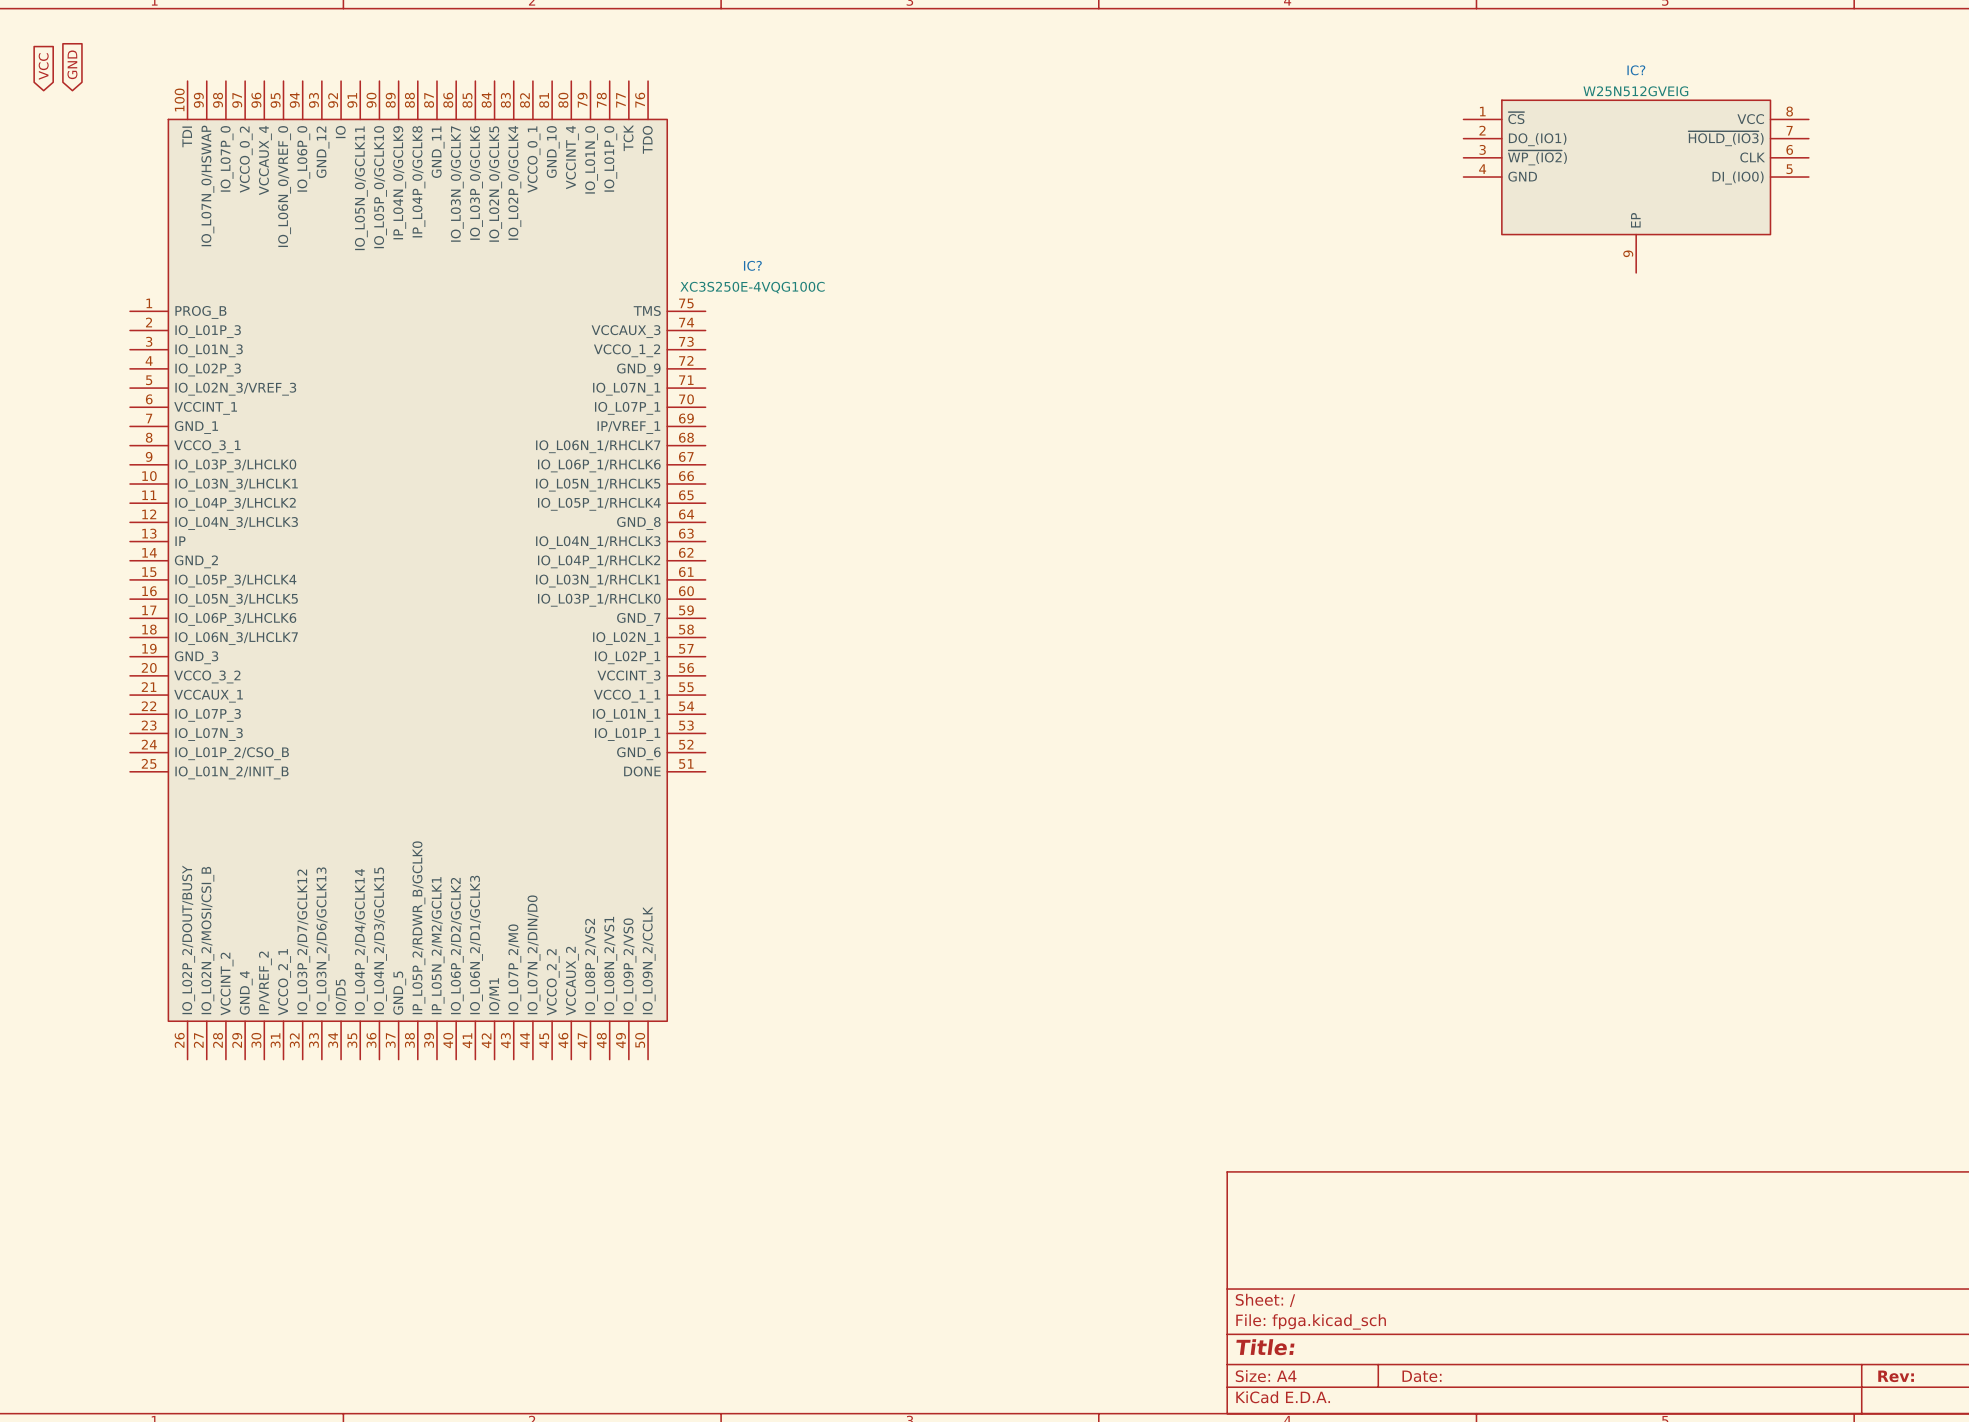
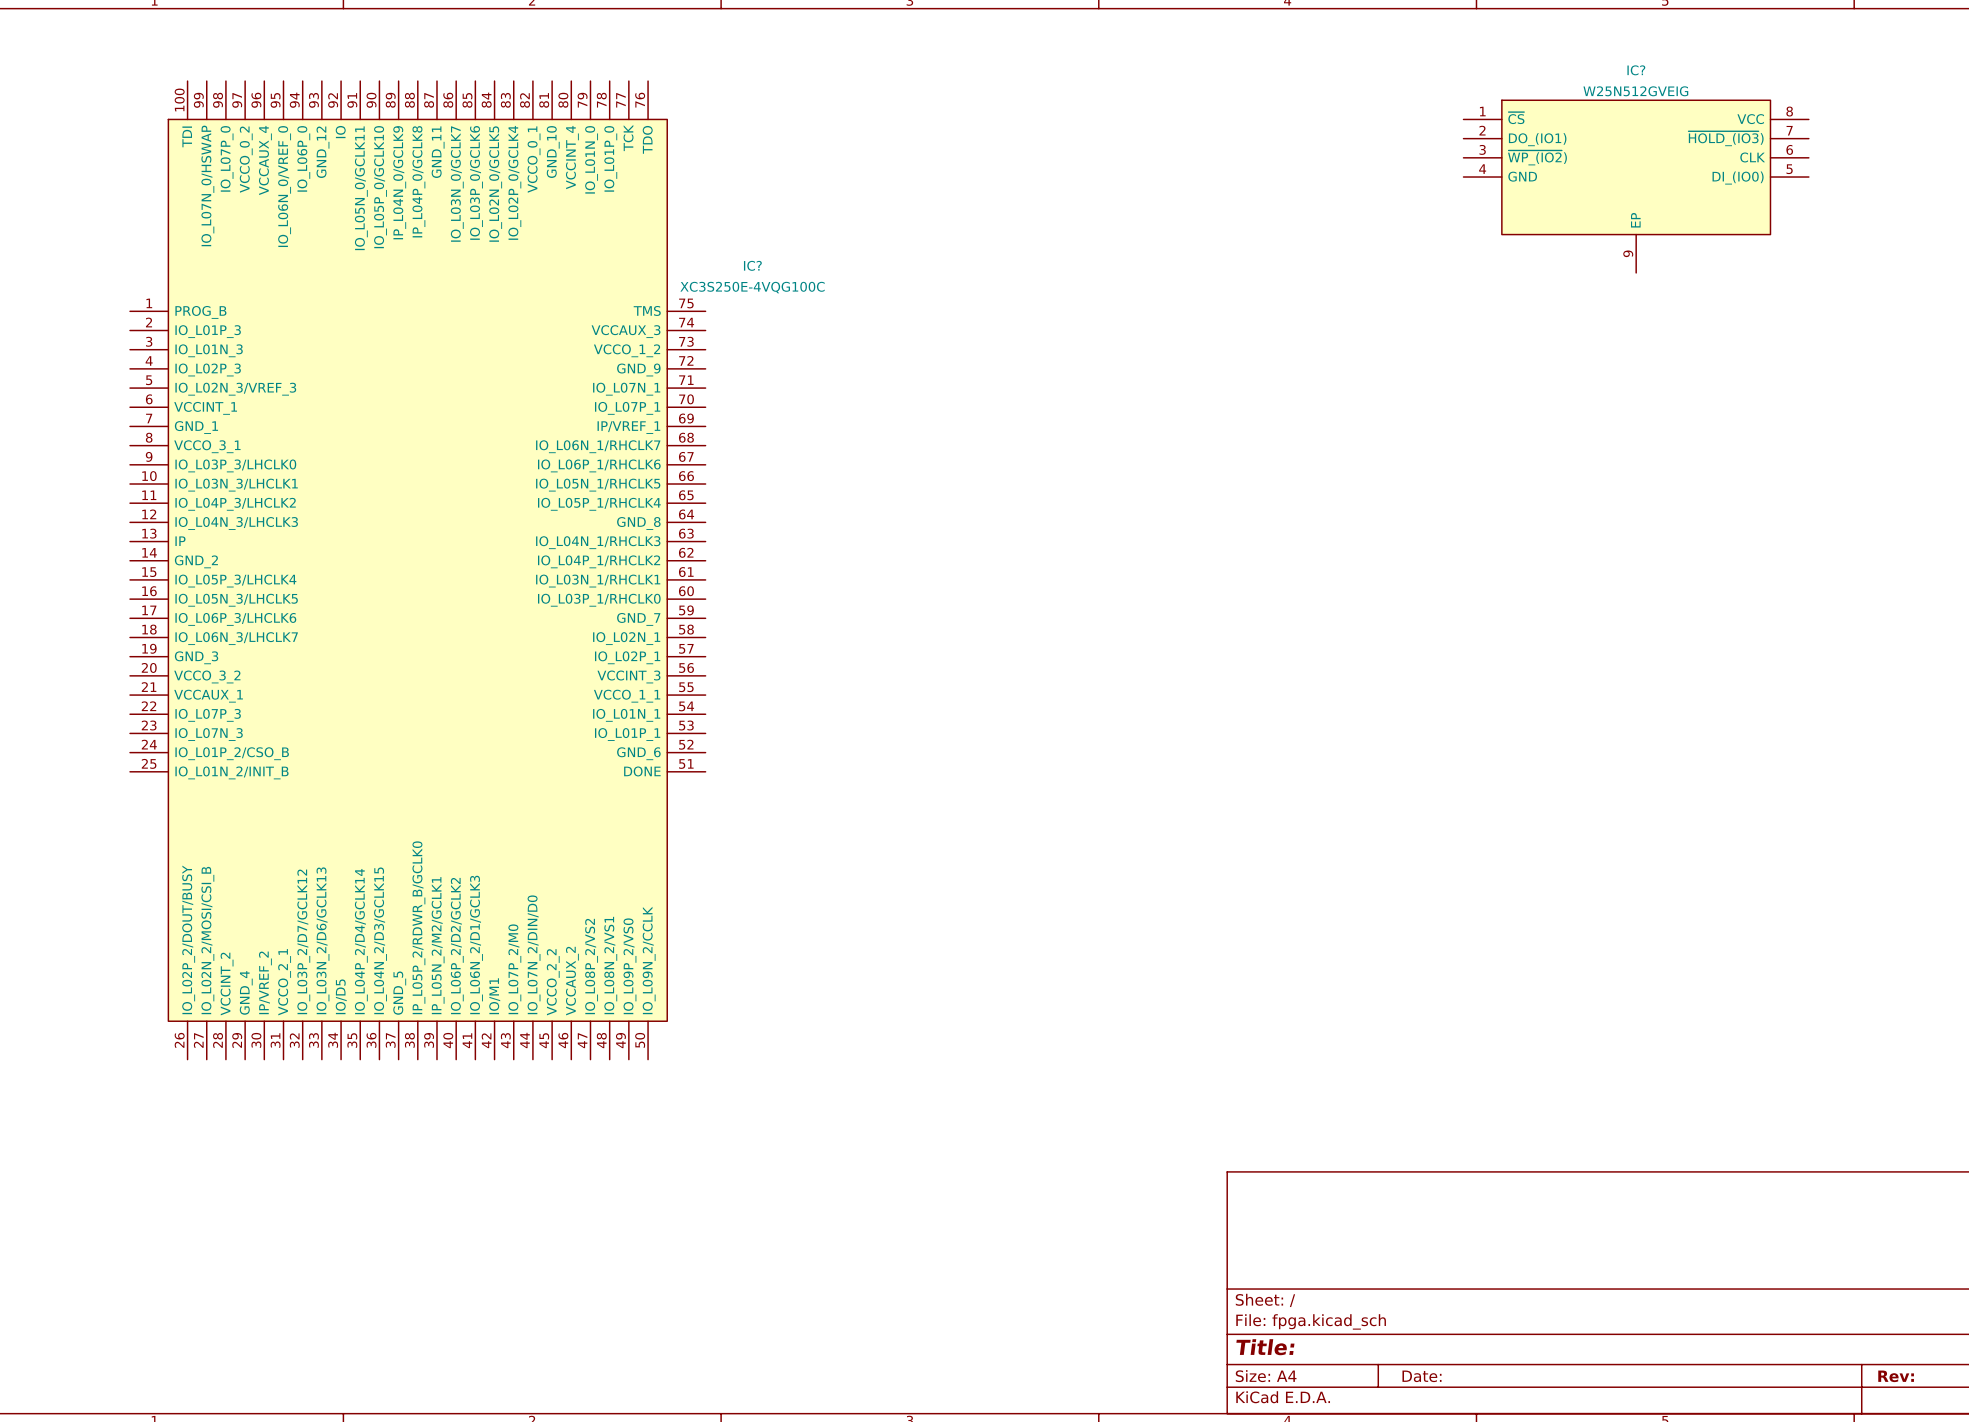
global label: GND (72, 64) -> none
global label: VCC (43, 66) -> none

